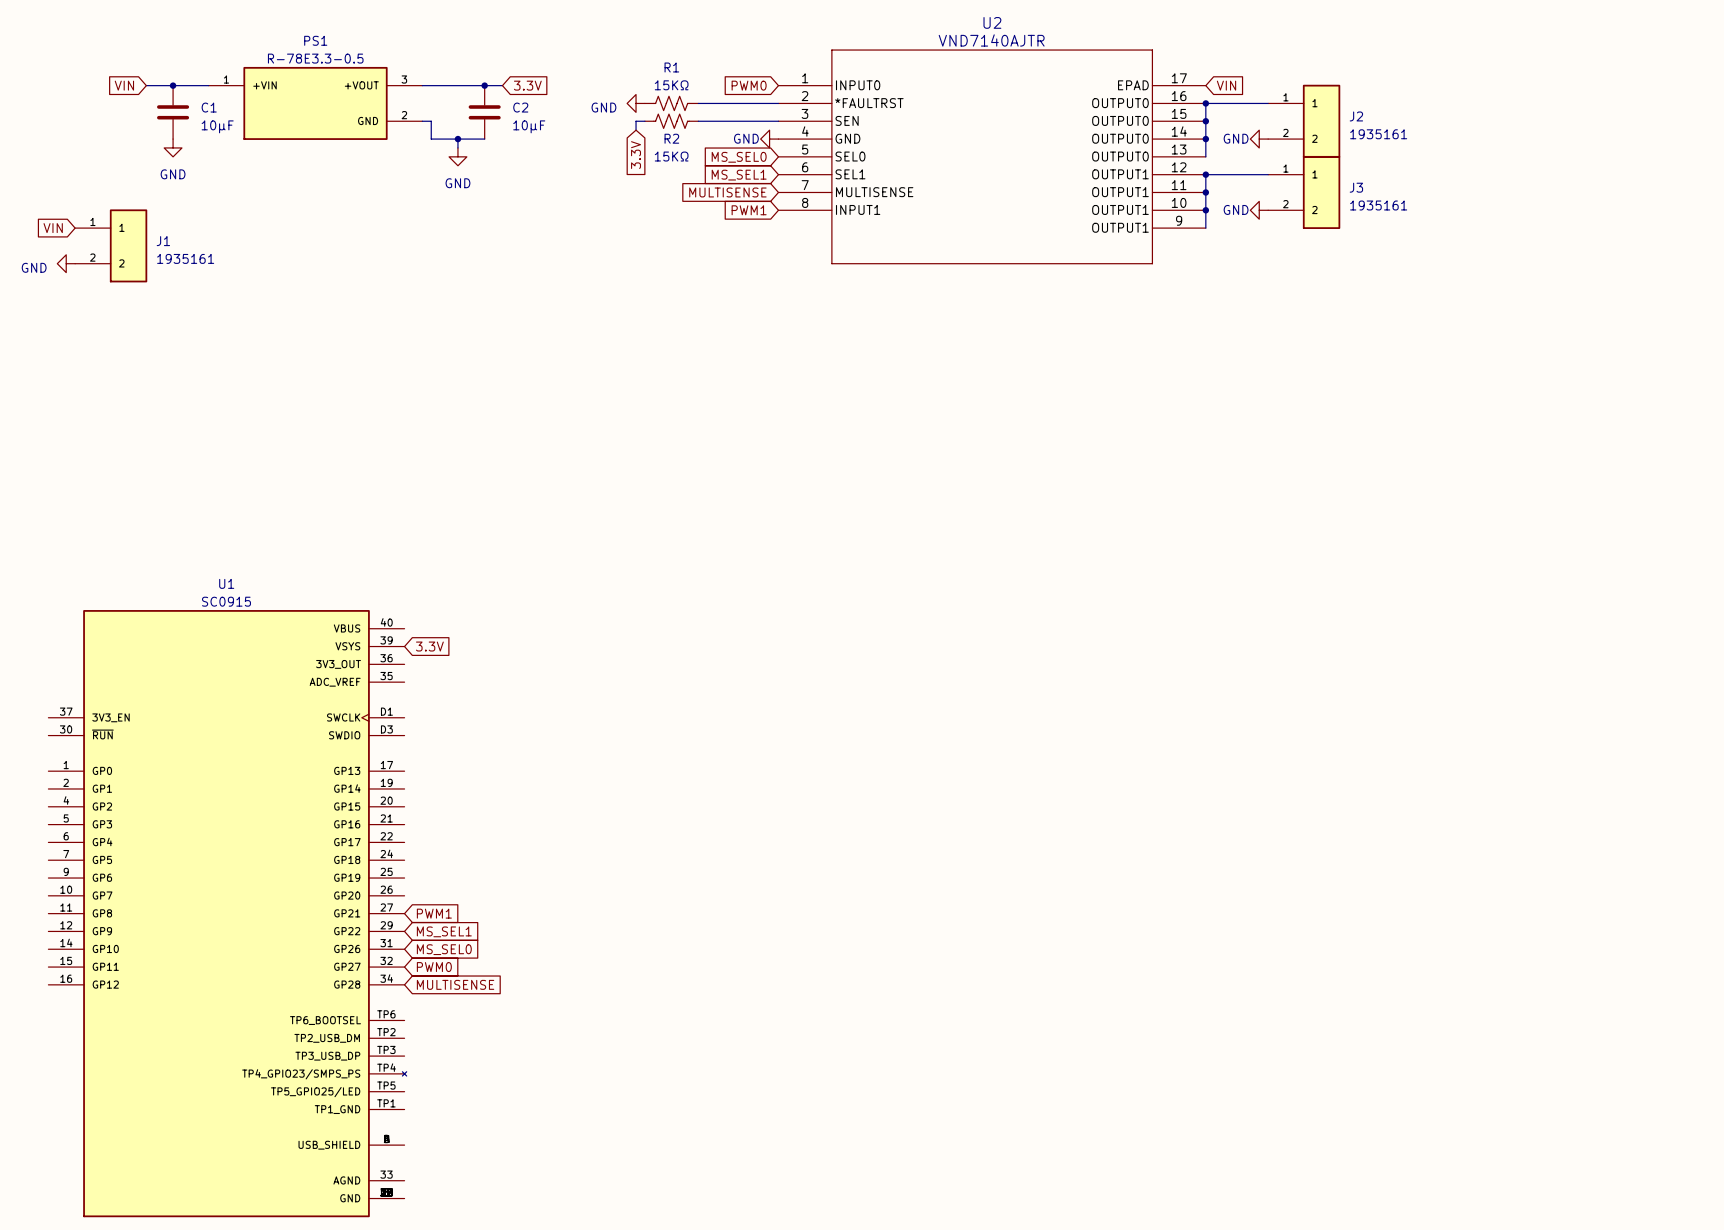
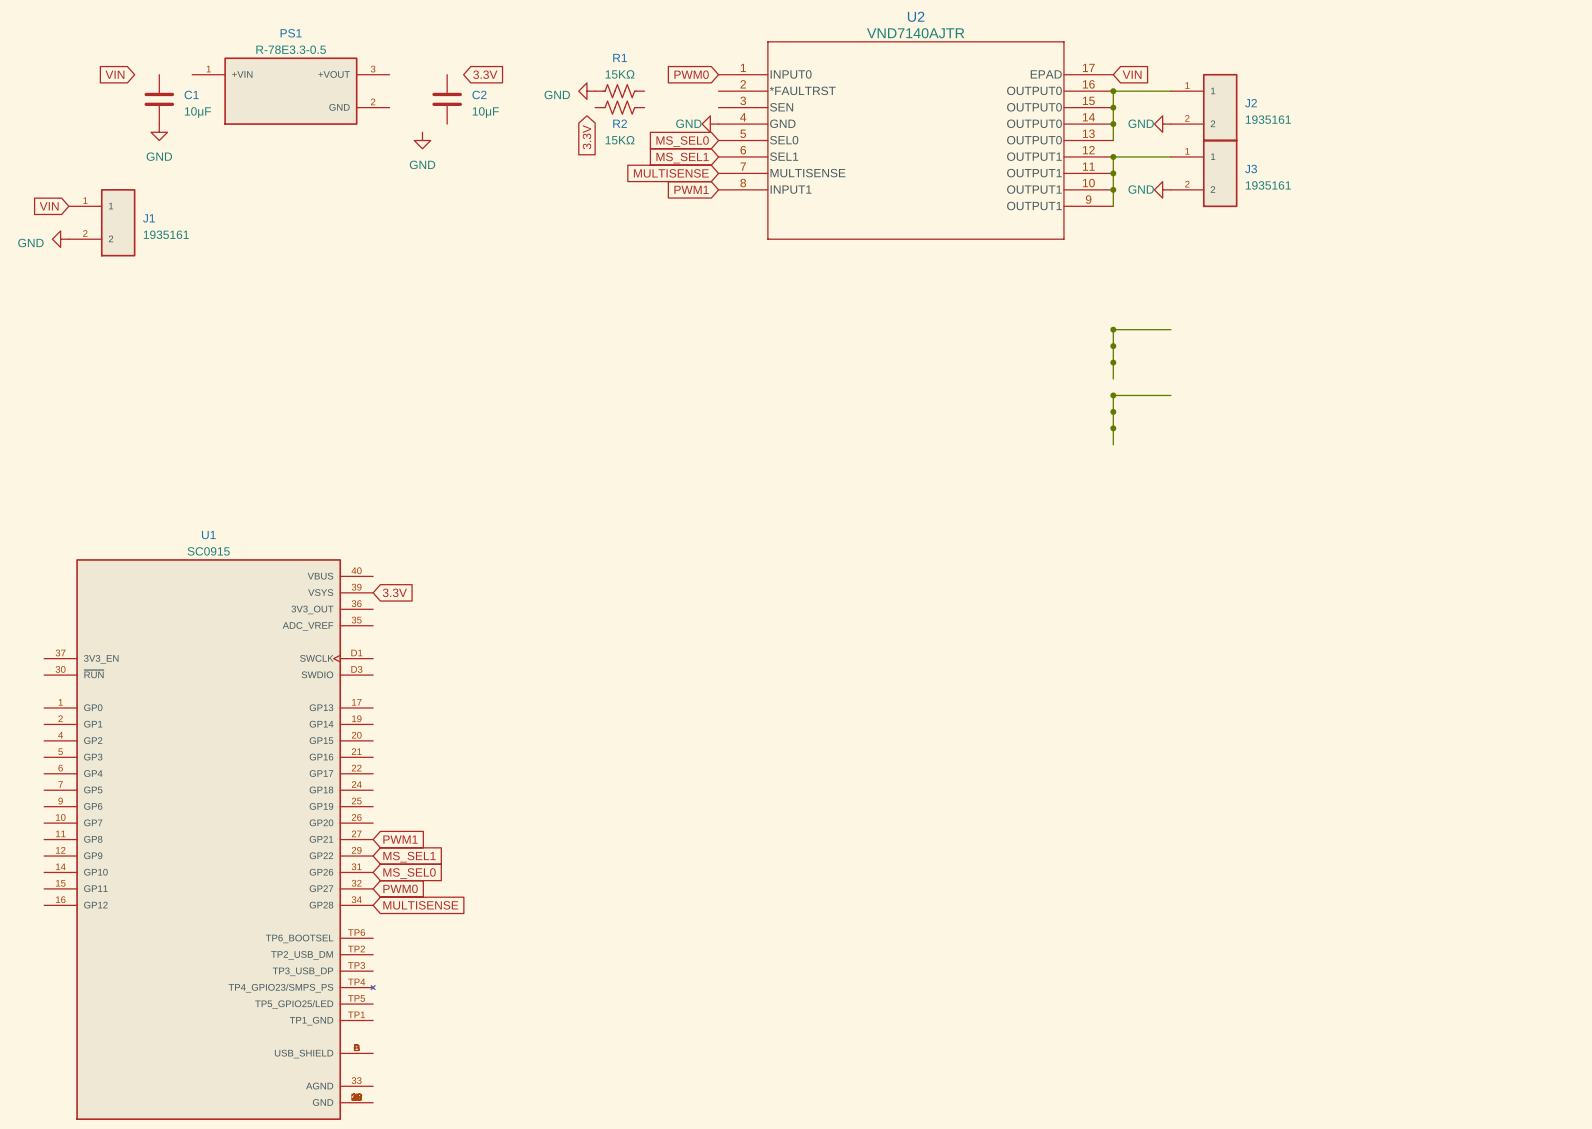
wire: (146, 85) (208, 85) -> none
junction: (173, 85) -> none
wire: (422, 85) (502, 85) -> none
junction: (484, 85) -> none
wire: (698, 103) (778, 103) -> none
wire: (422, 121) (431, 121) (431, 139) (484, 139) -> none
wire: (644, 121) (636, 121) (636, 130) -> none
wire: (698, 121) (778, 121) -> none
wire: (457, 139) (457, 147) -> none
junction: (457, 139) -> none
junction: none -> (1113, 329)
wire: none -> (1170, 329) (1113, 329) (1113, 379)
junction: none -> (1113, 346)
junction: none -> (1113, 362)
junction: none -> (1113, 395)
wire: none -> (1170, 395) (1113, 395) (1113, 444)
junction: none -> (1113, 411)
junction: none -> (1113, 428)

